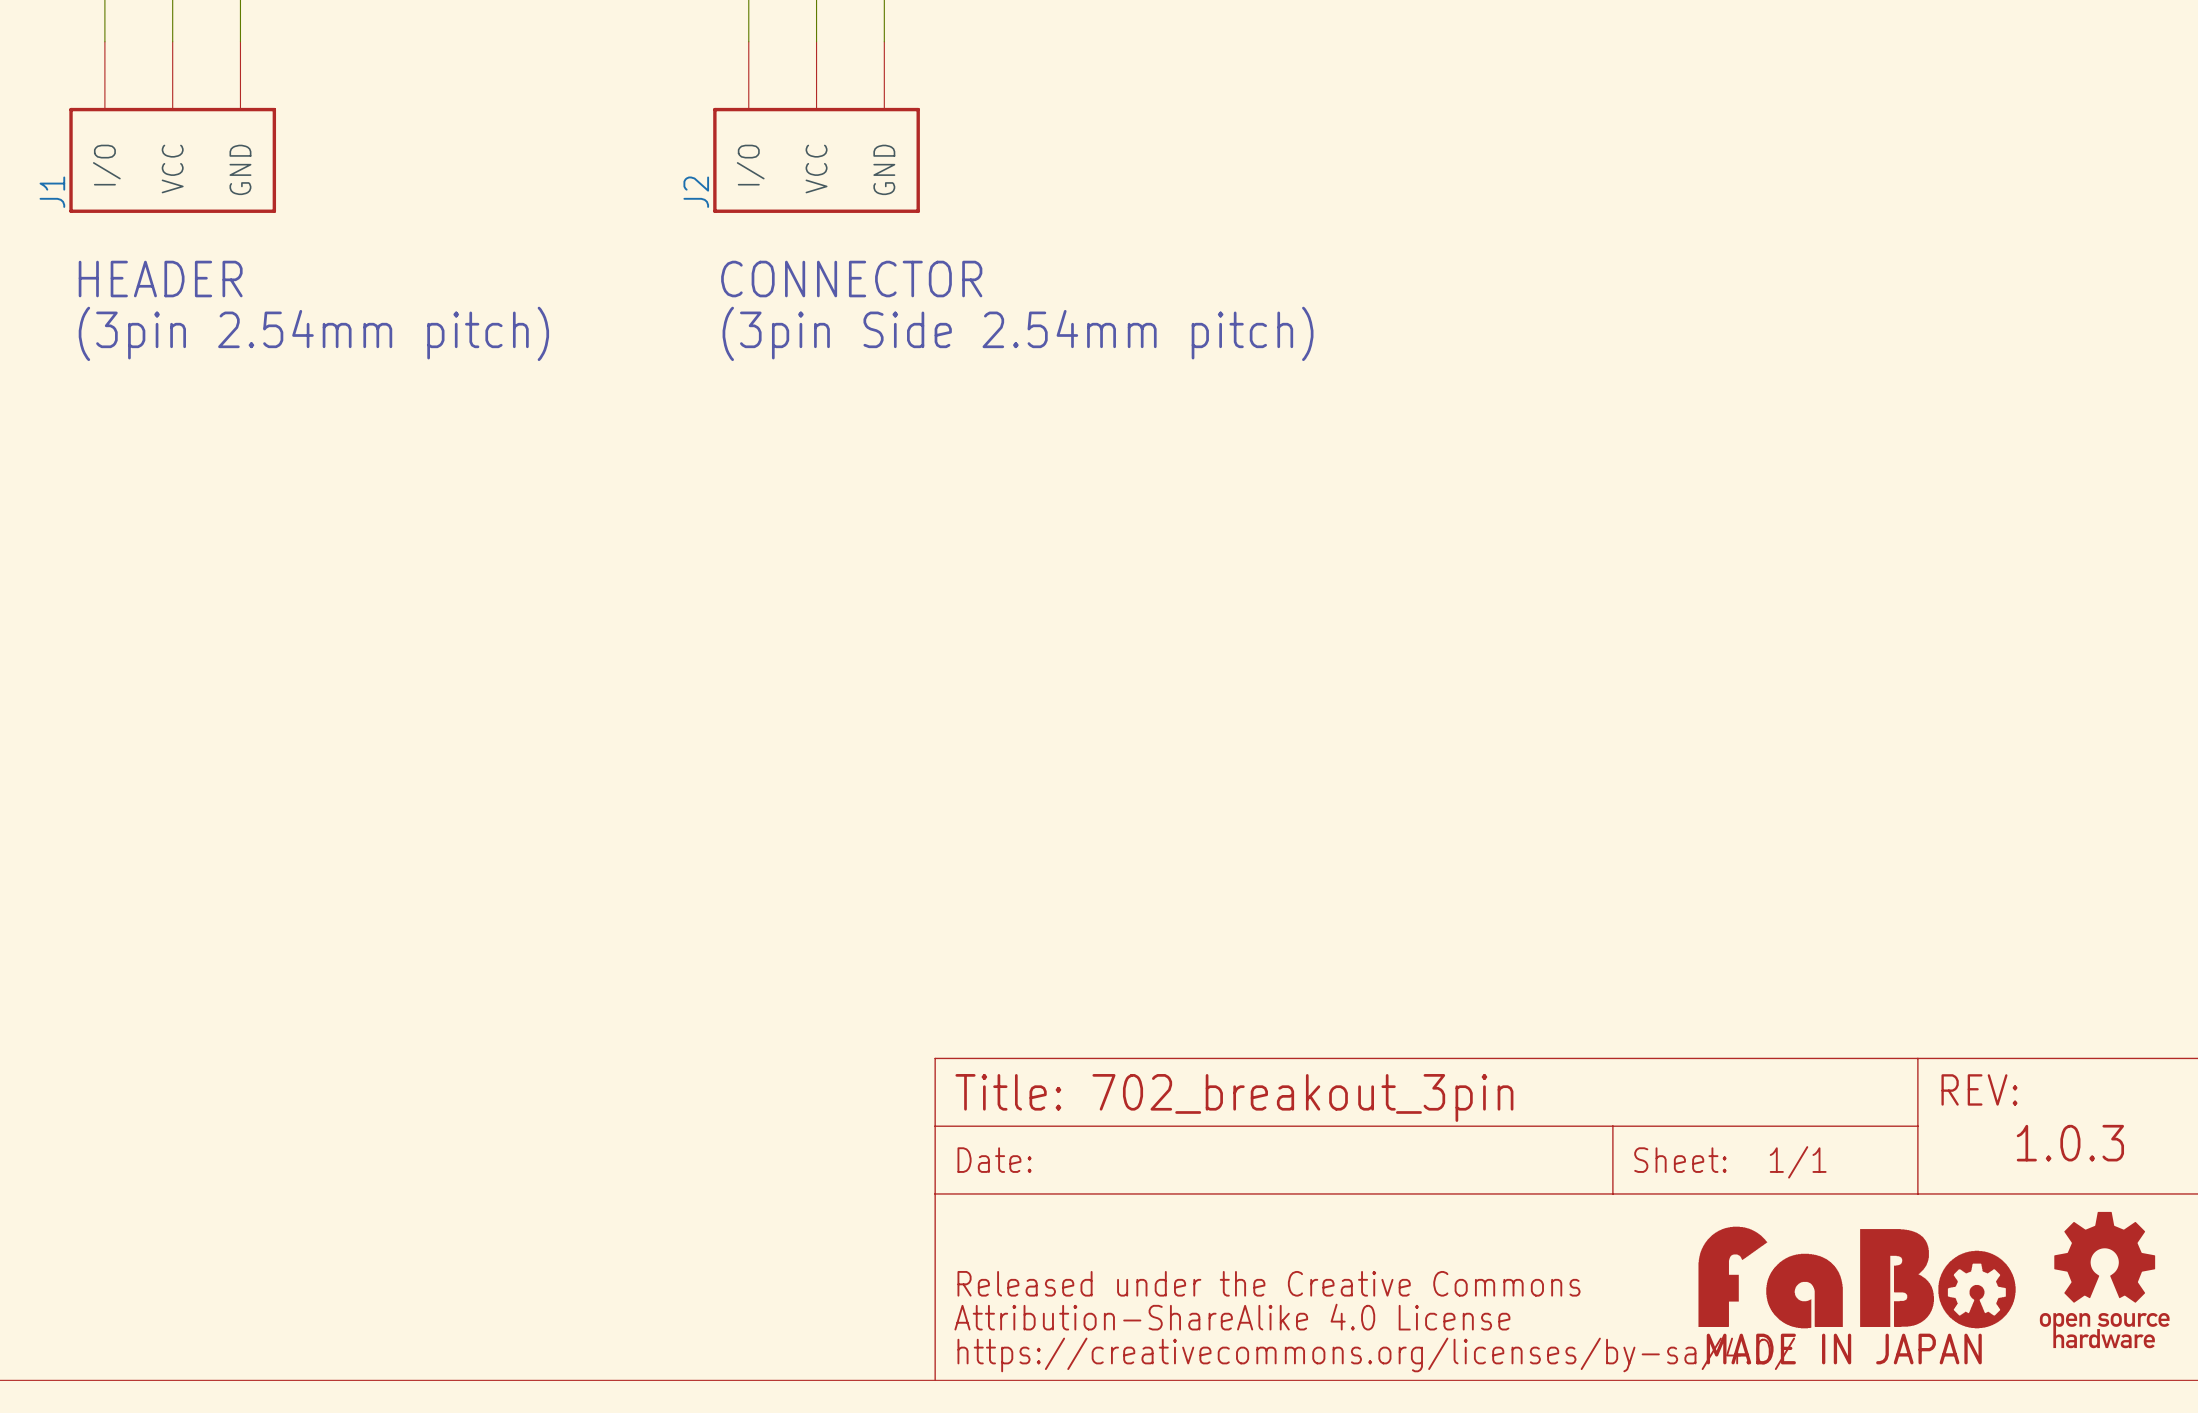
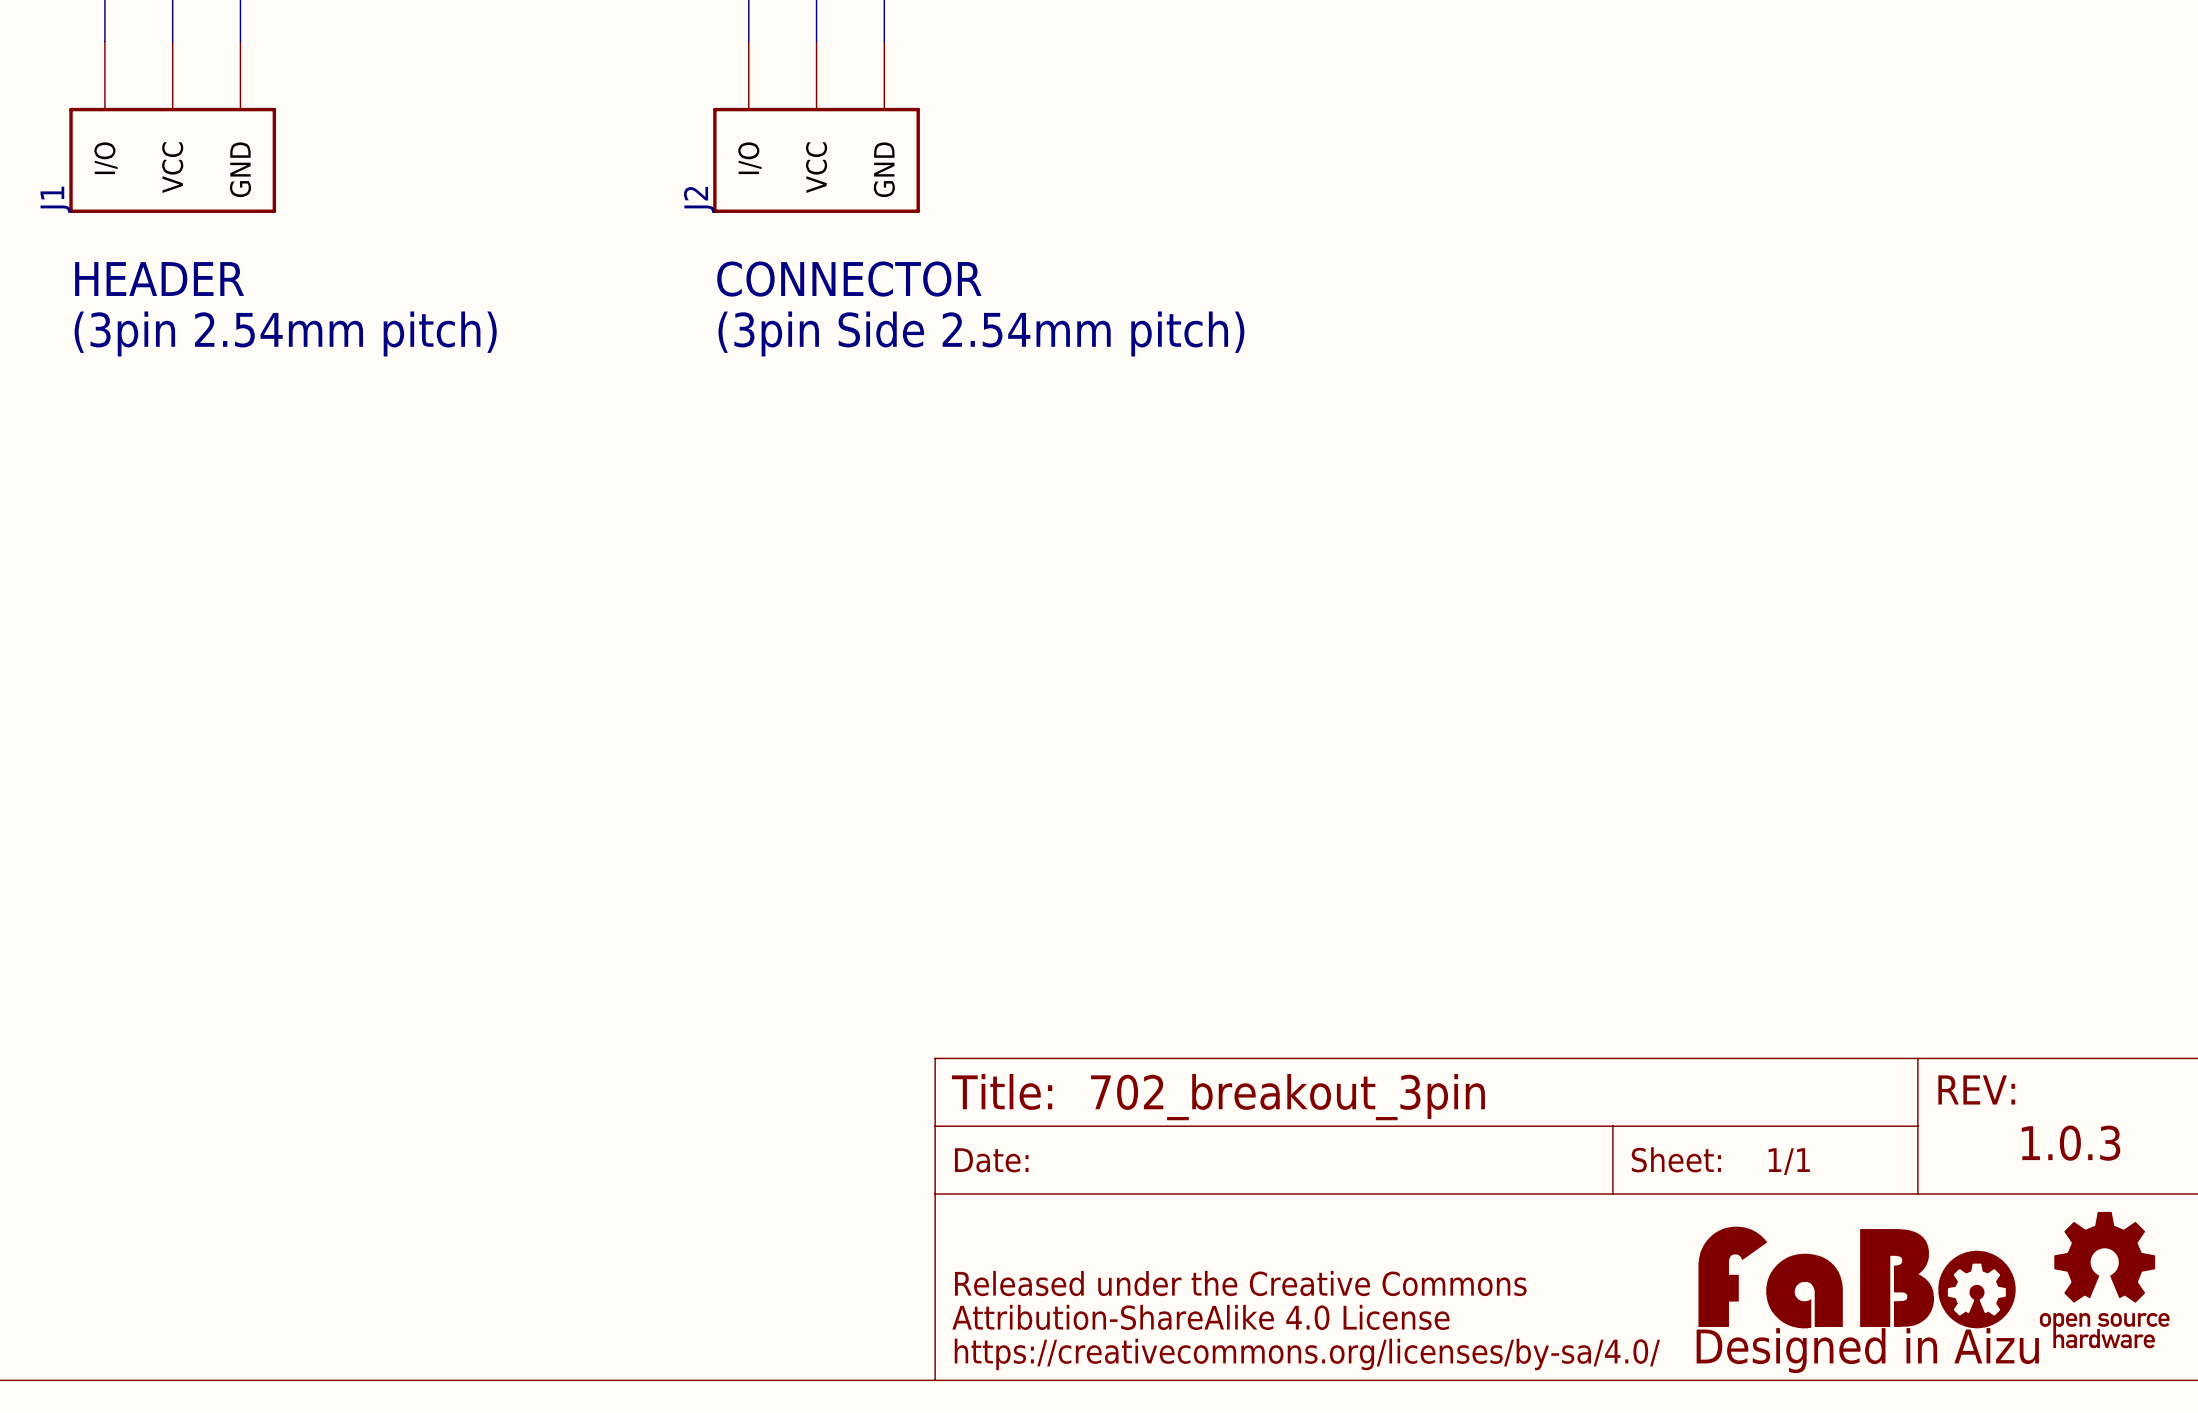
part text: MADE IN JAPAN (1844, 1349) -> none
part text: none -> Designed in Aizu (1867, 1350)

